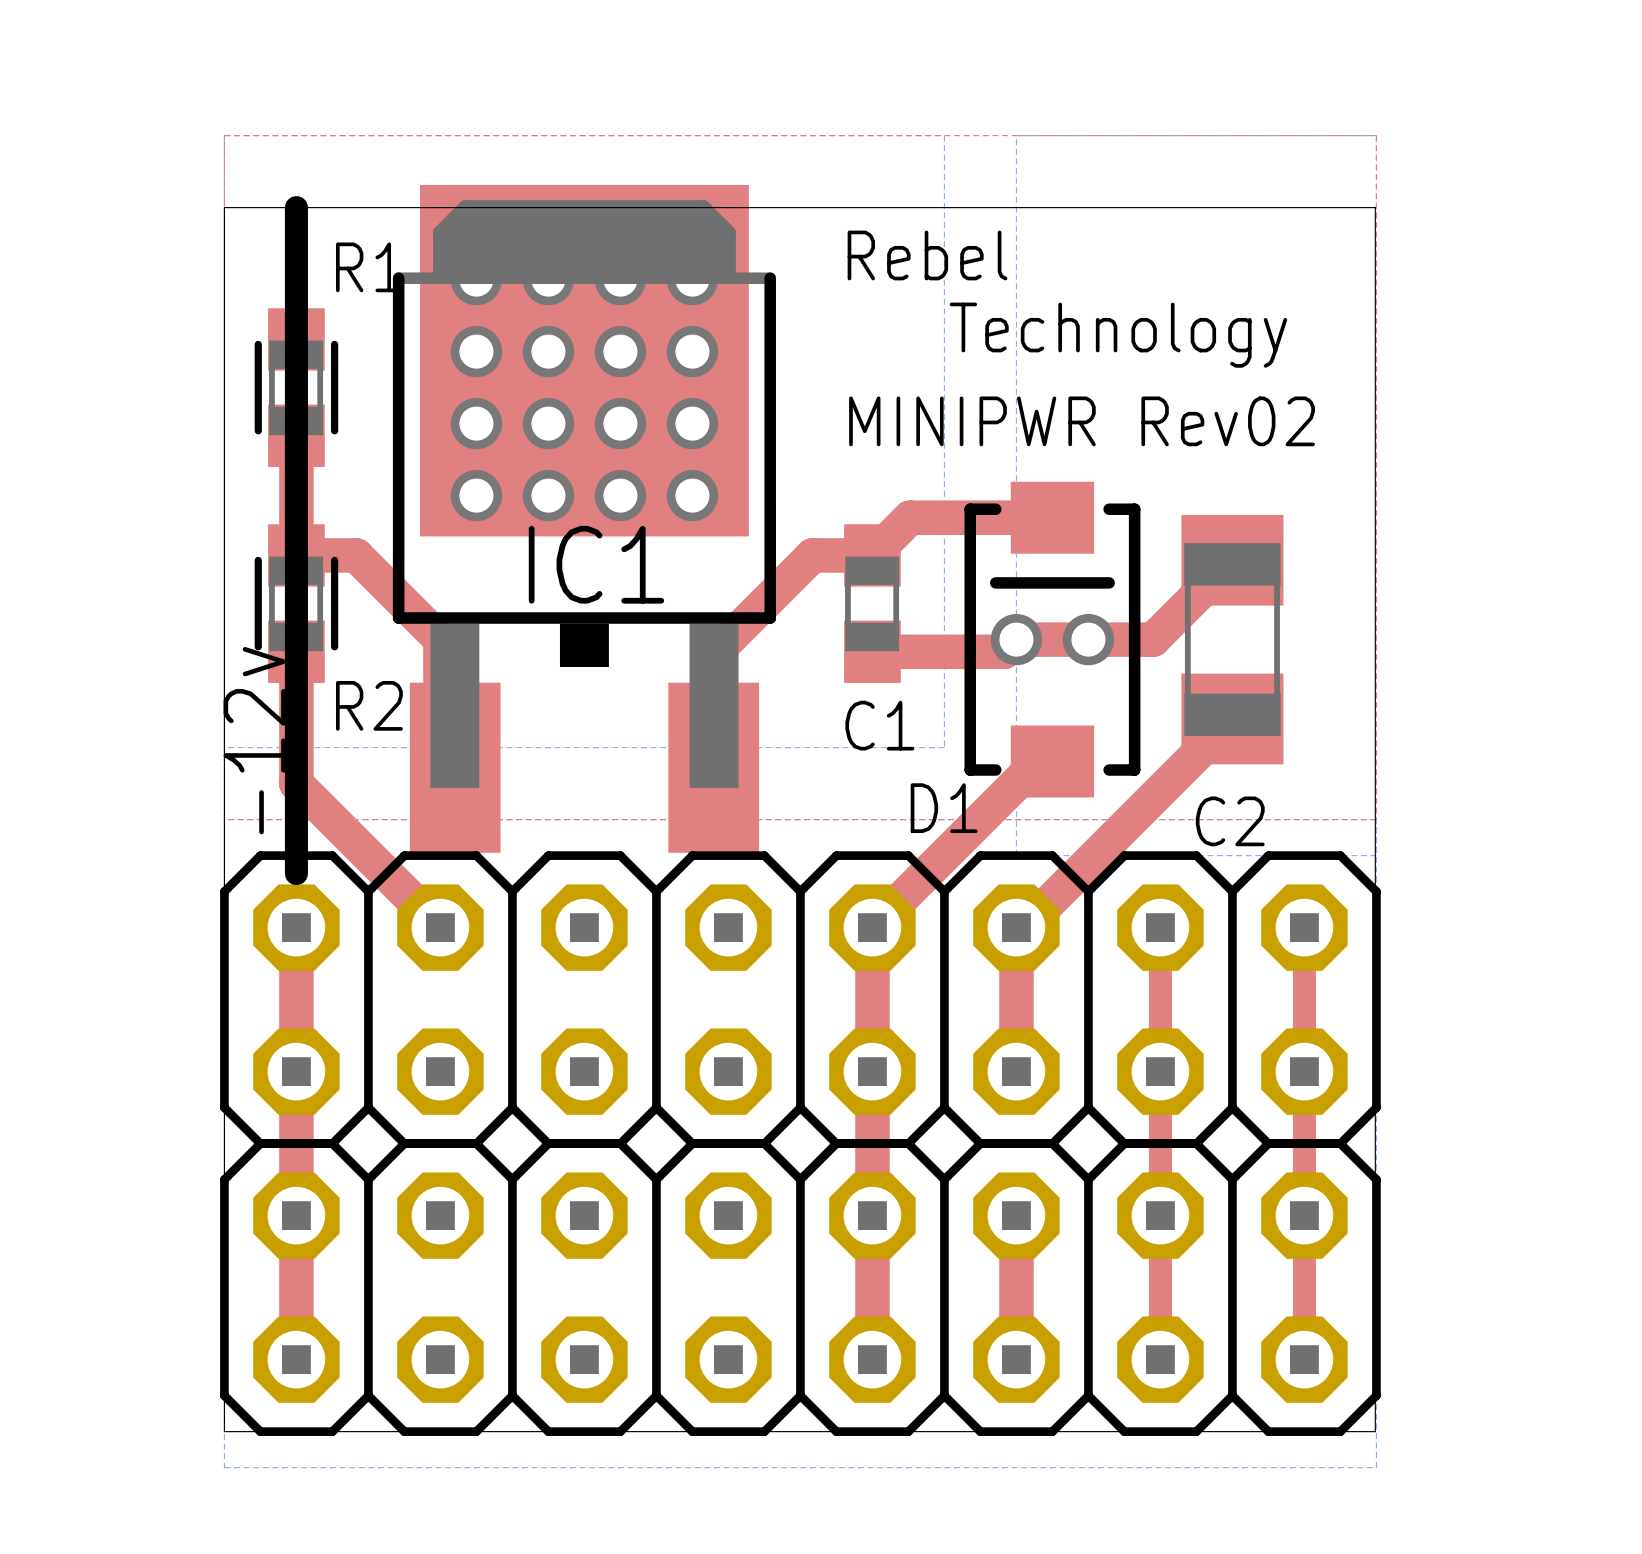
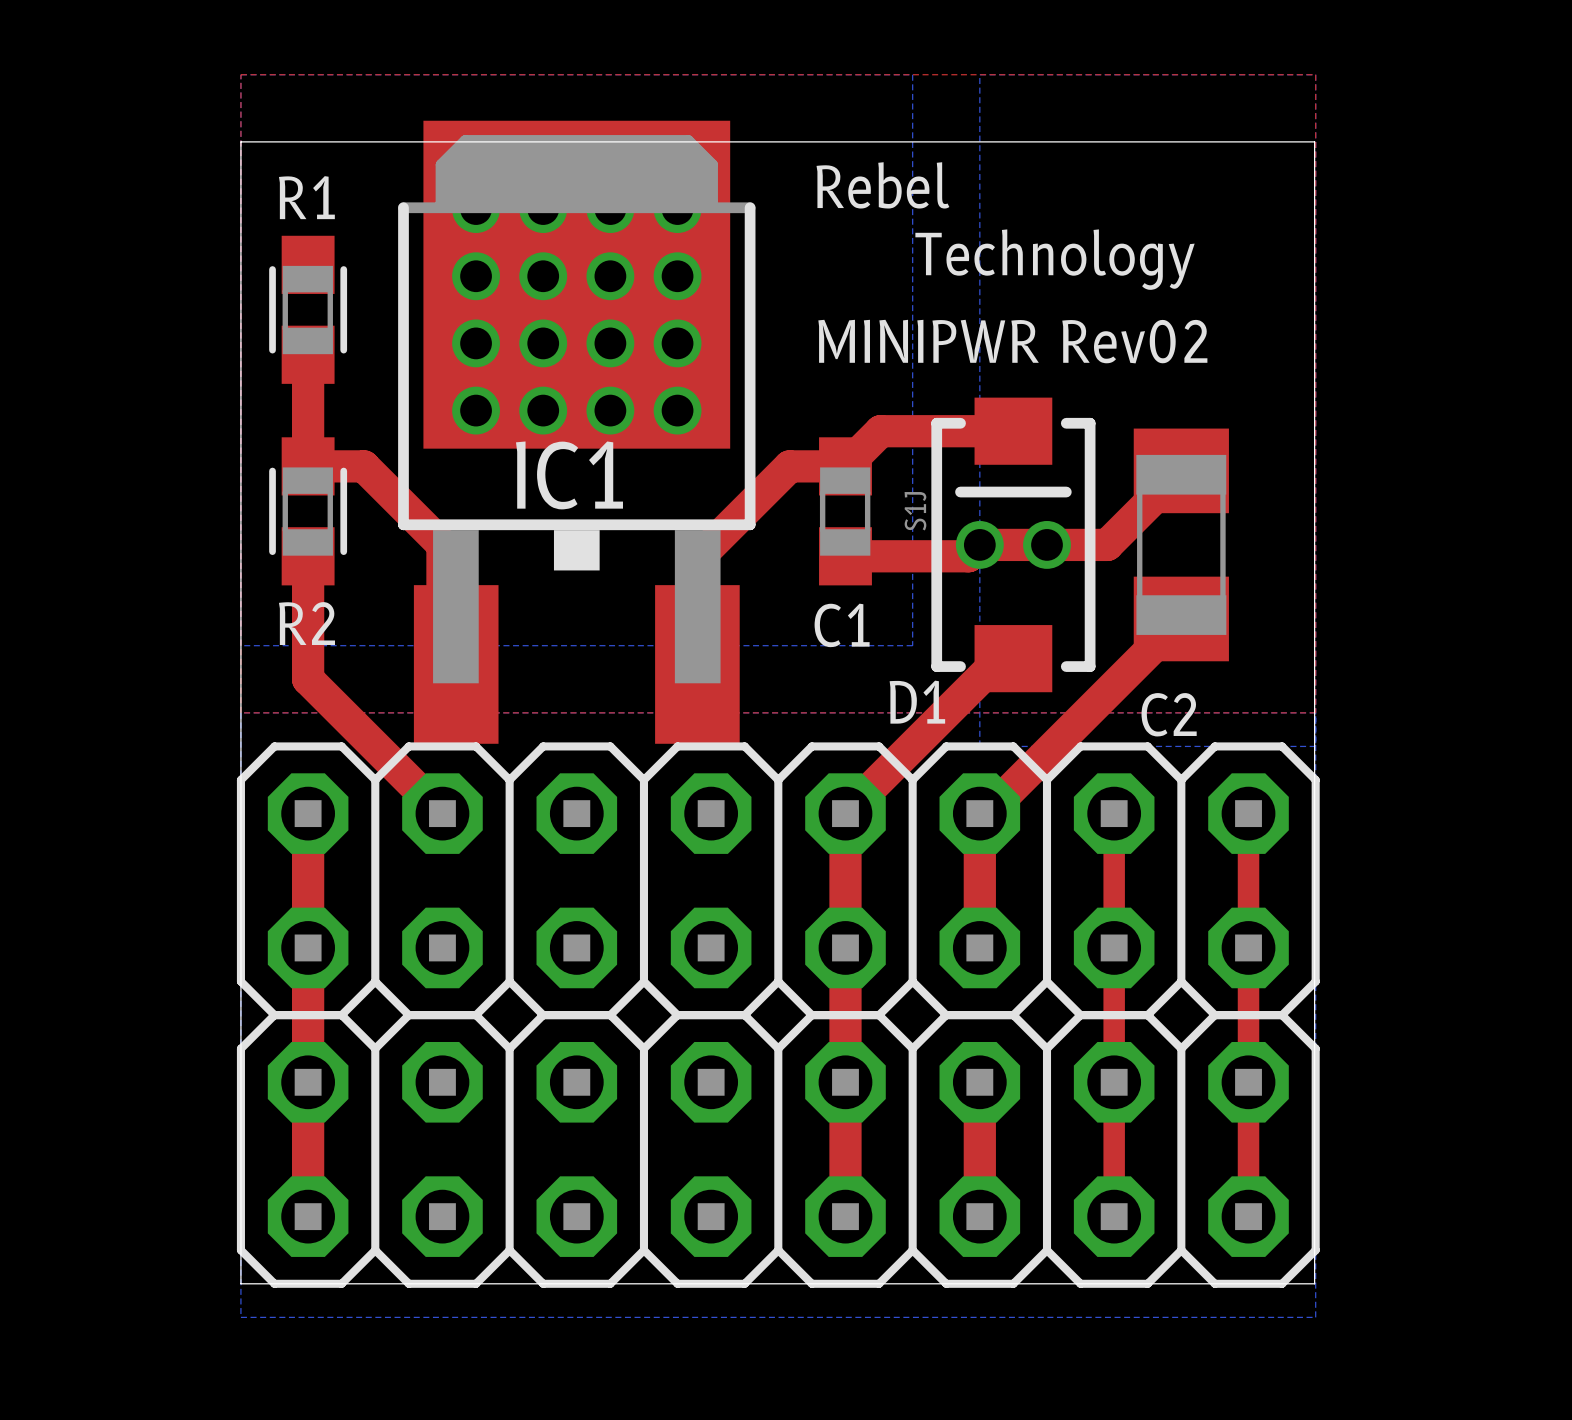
line: (296, 207) (296, 873) -> none
R1 name position: R1 (369, 267) -> R1 (306, 197)
D1 value: none -> S1J (915, 511)
R2 name position: R2 (369, 705) -> R2 (306, 623)
text: -12v (254, 740) -> none

